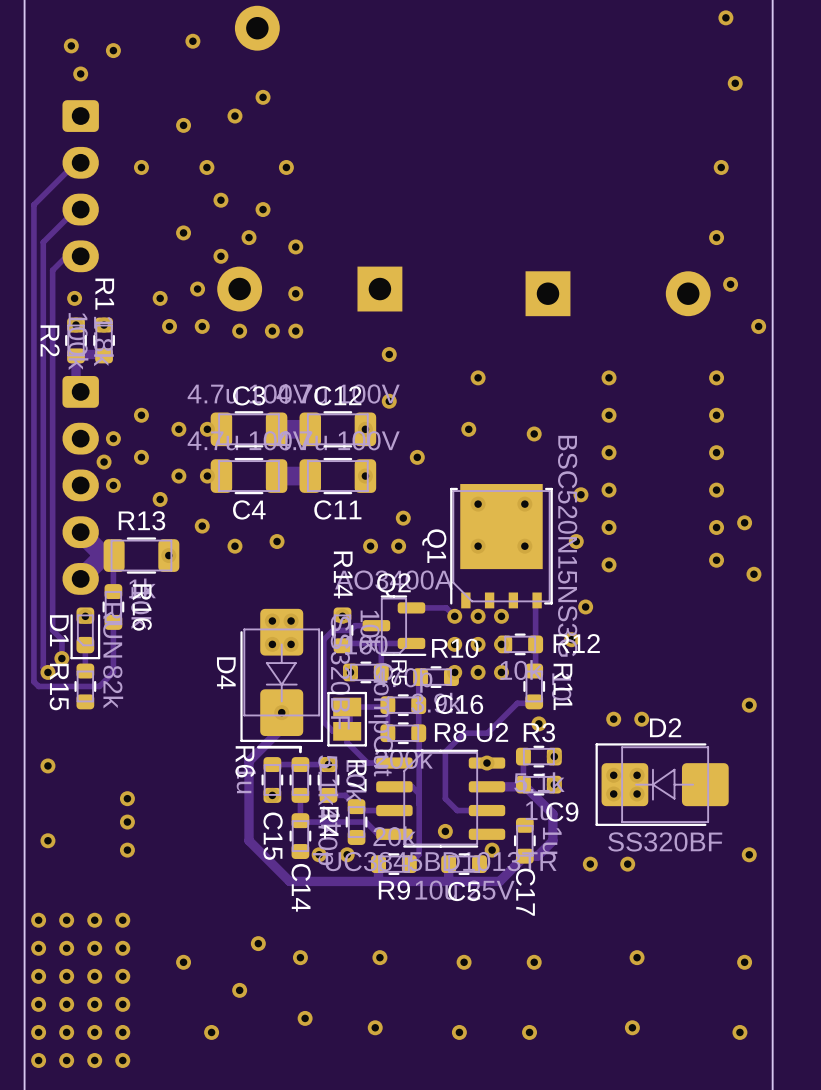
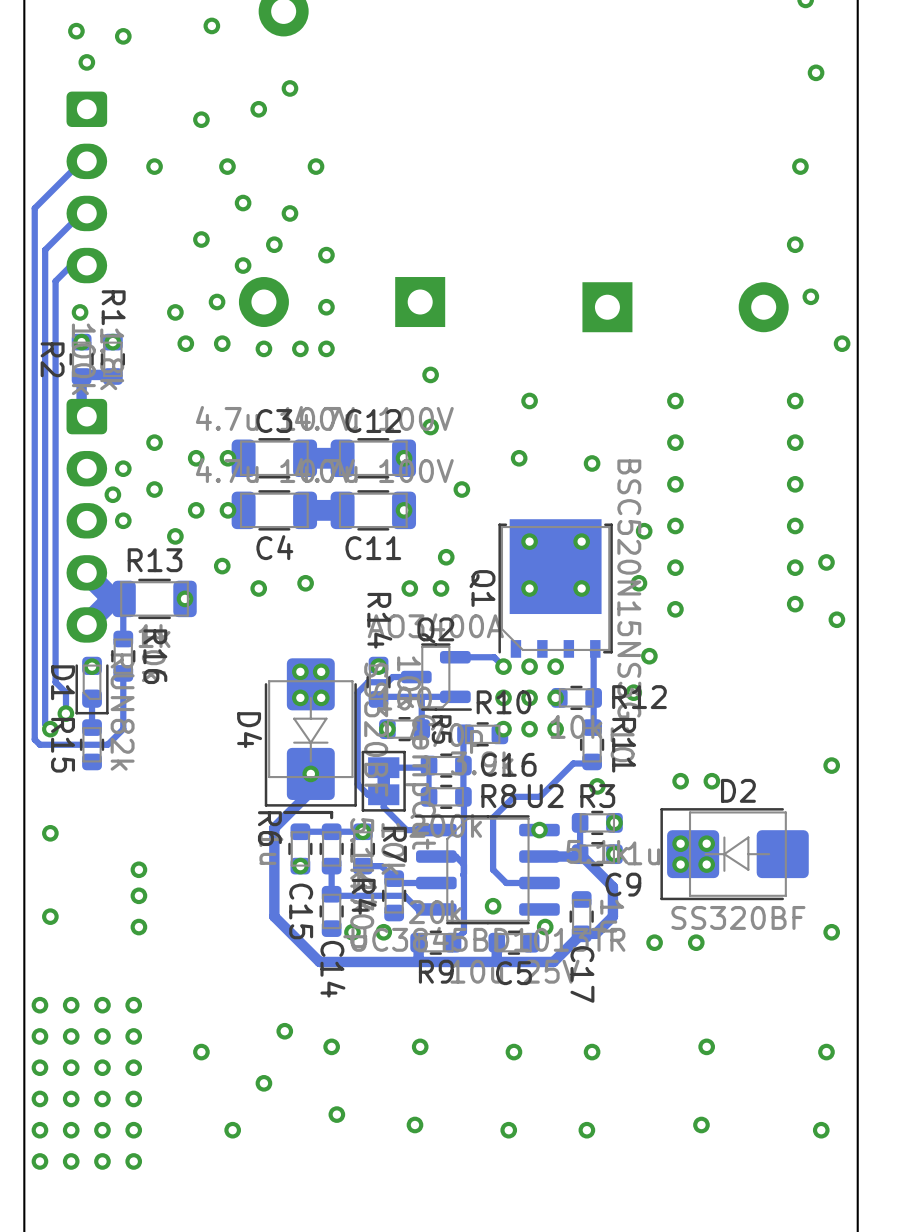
C9 value position: 1u (539, 810) -> 1u (643, 853)

